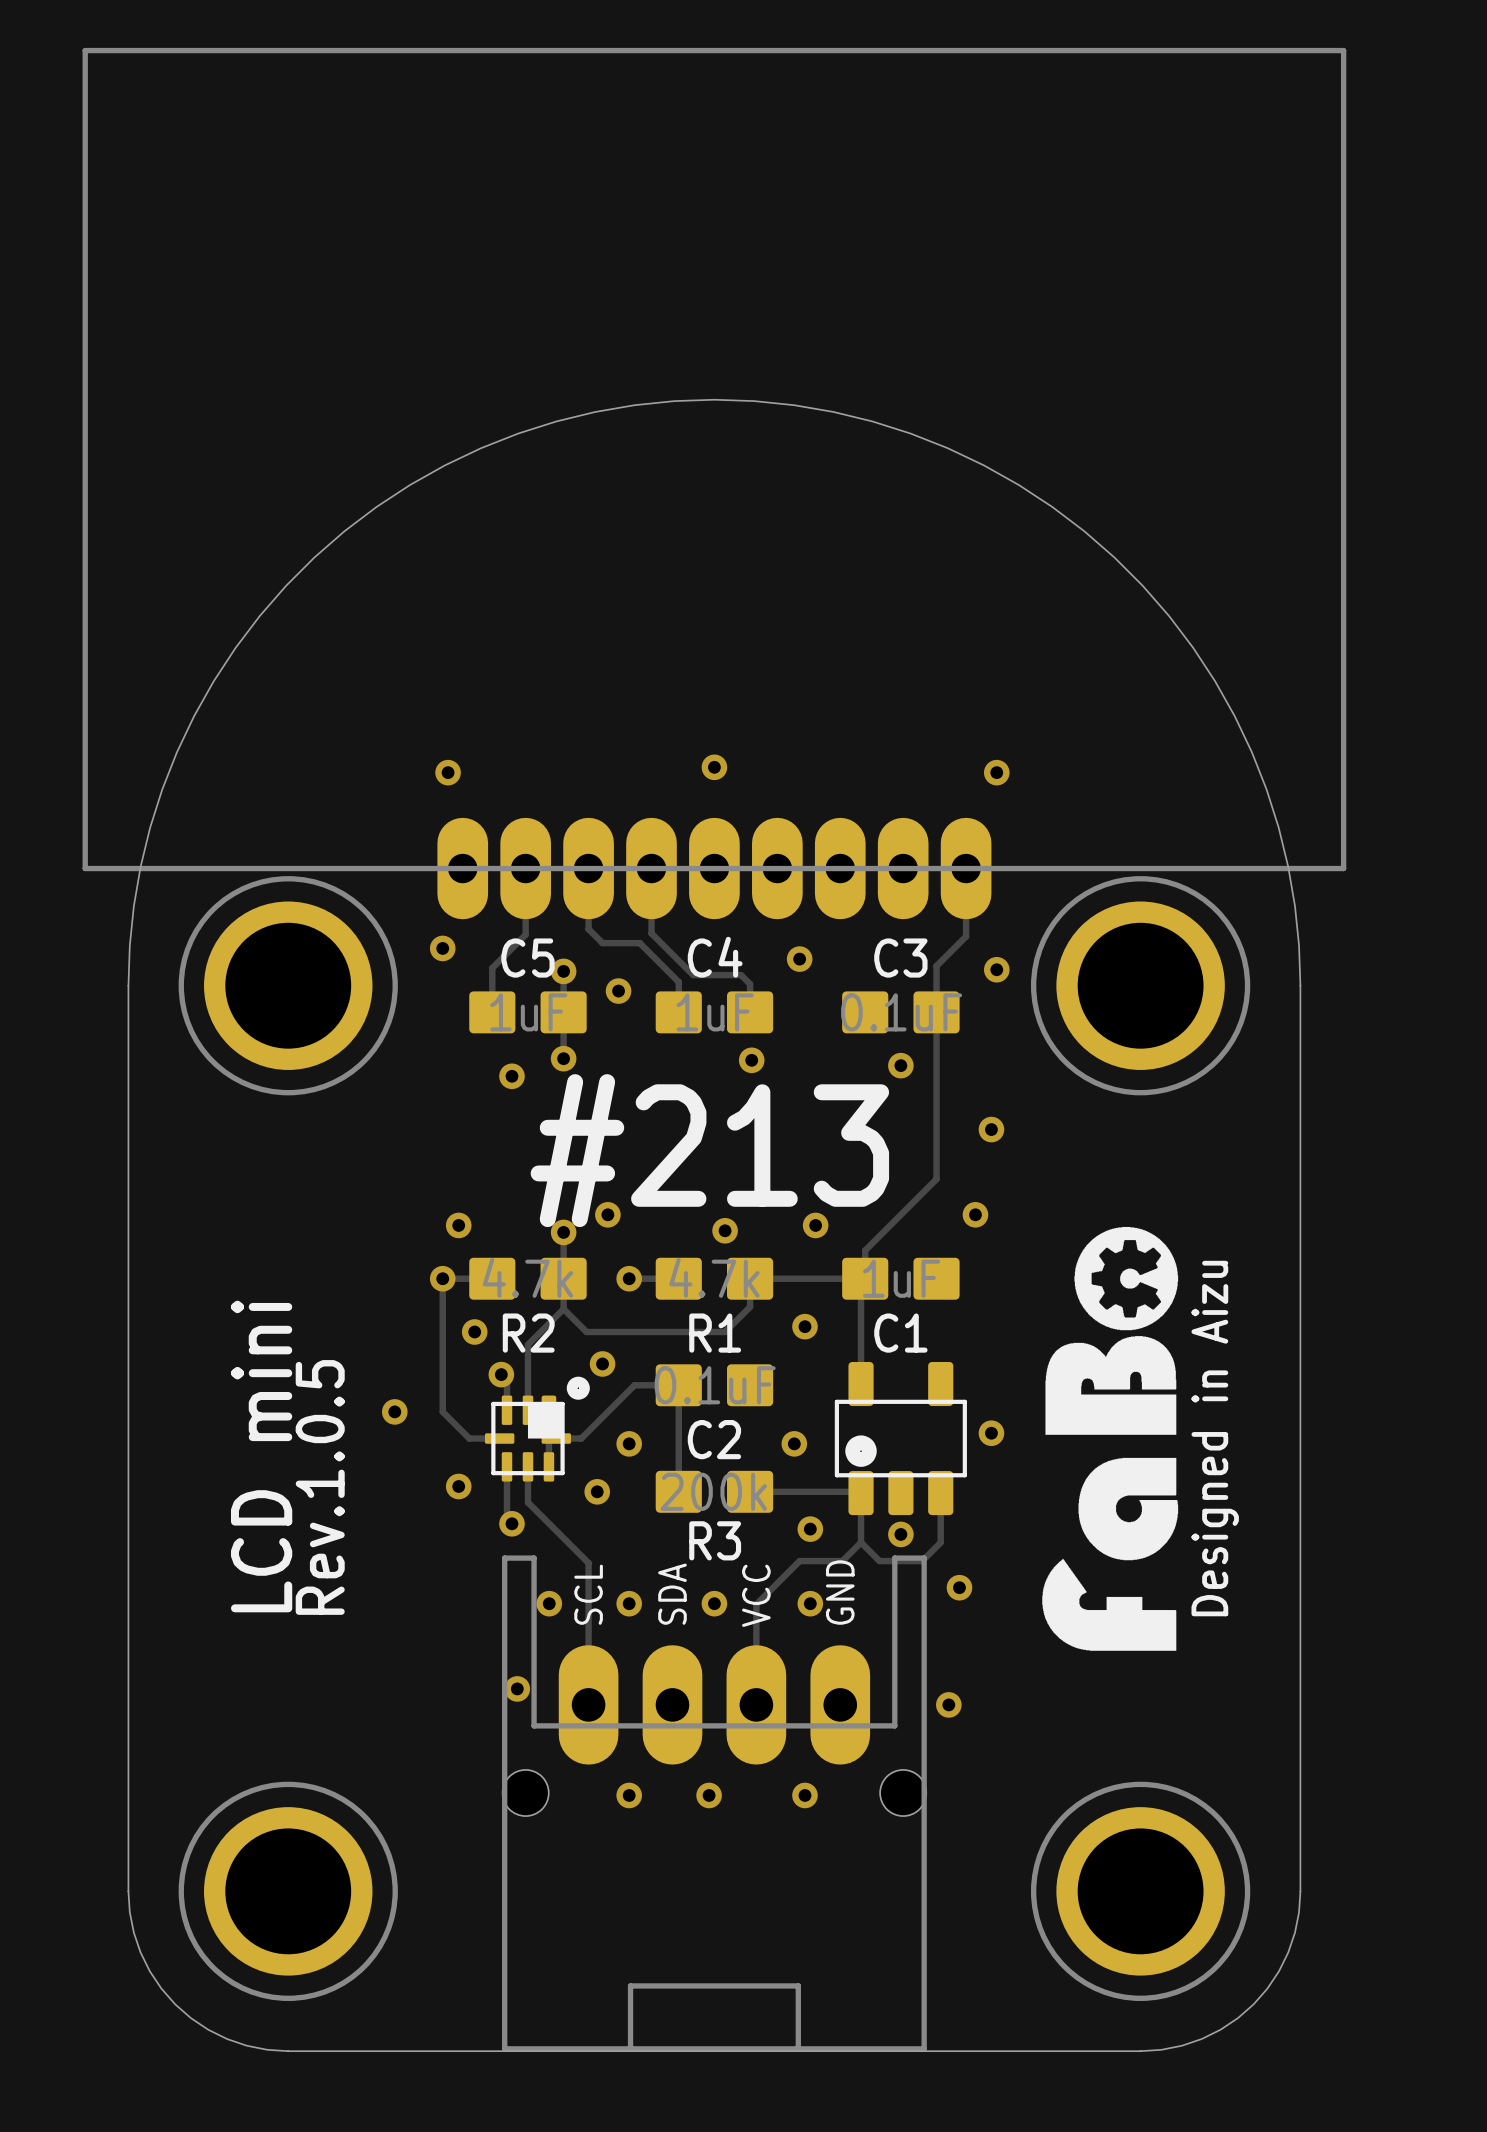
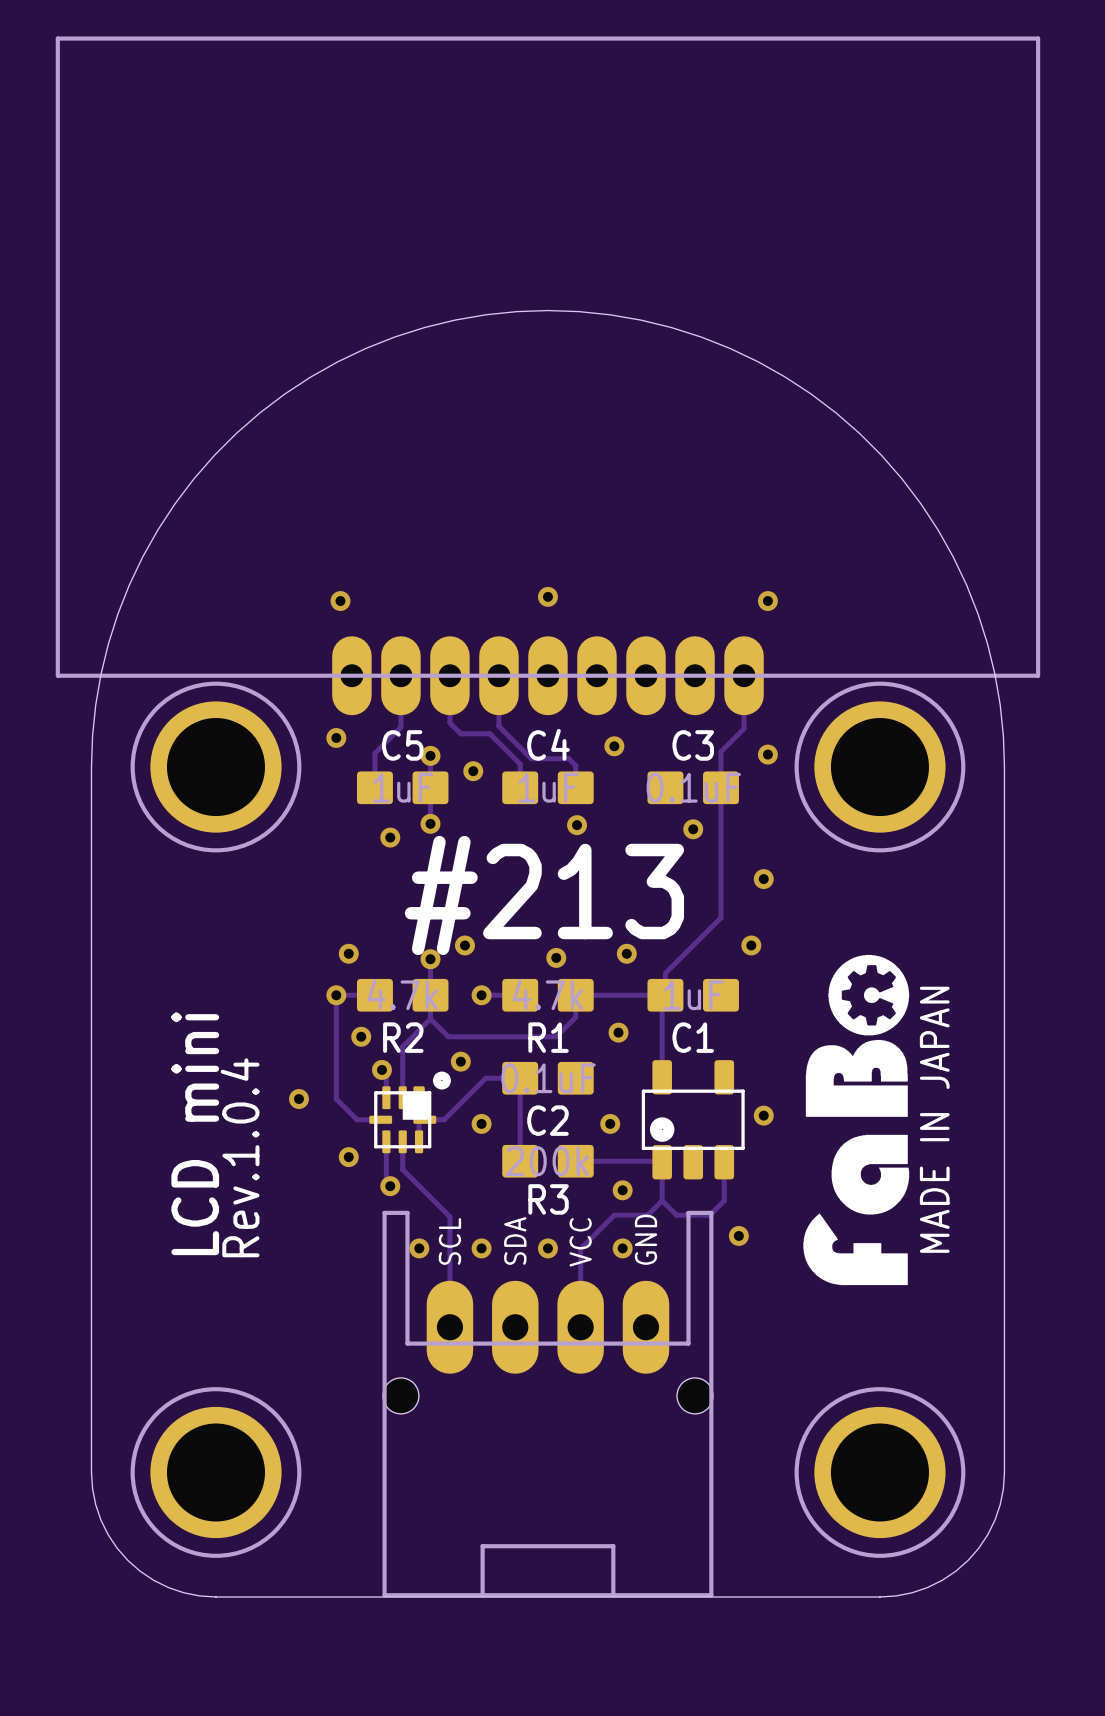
text: Designed in Aizu (1215, 1438) -> MADE IN JAPAN (934, 1119)
text: Rev.1.0.5 (320, 1487) -> Rev.1.0.4 (240, 1157)
via: (597, 1491) -> none
via: (900, 1534) -> none
via: (517, 1688) -> none
via: (948, 1704) -> none
via: (629, 1795) -> none
via: (709, 1795) -> none
via: (804, 1795) -> none

